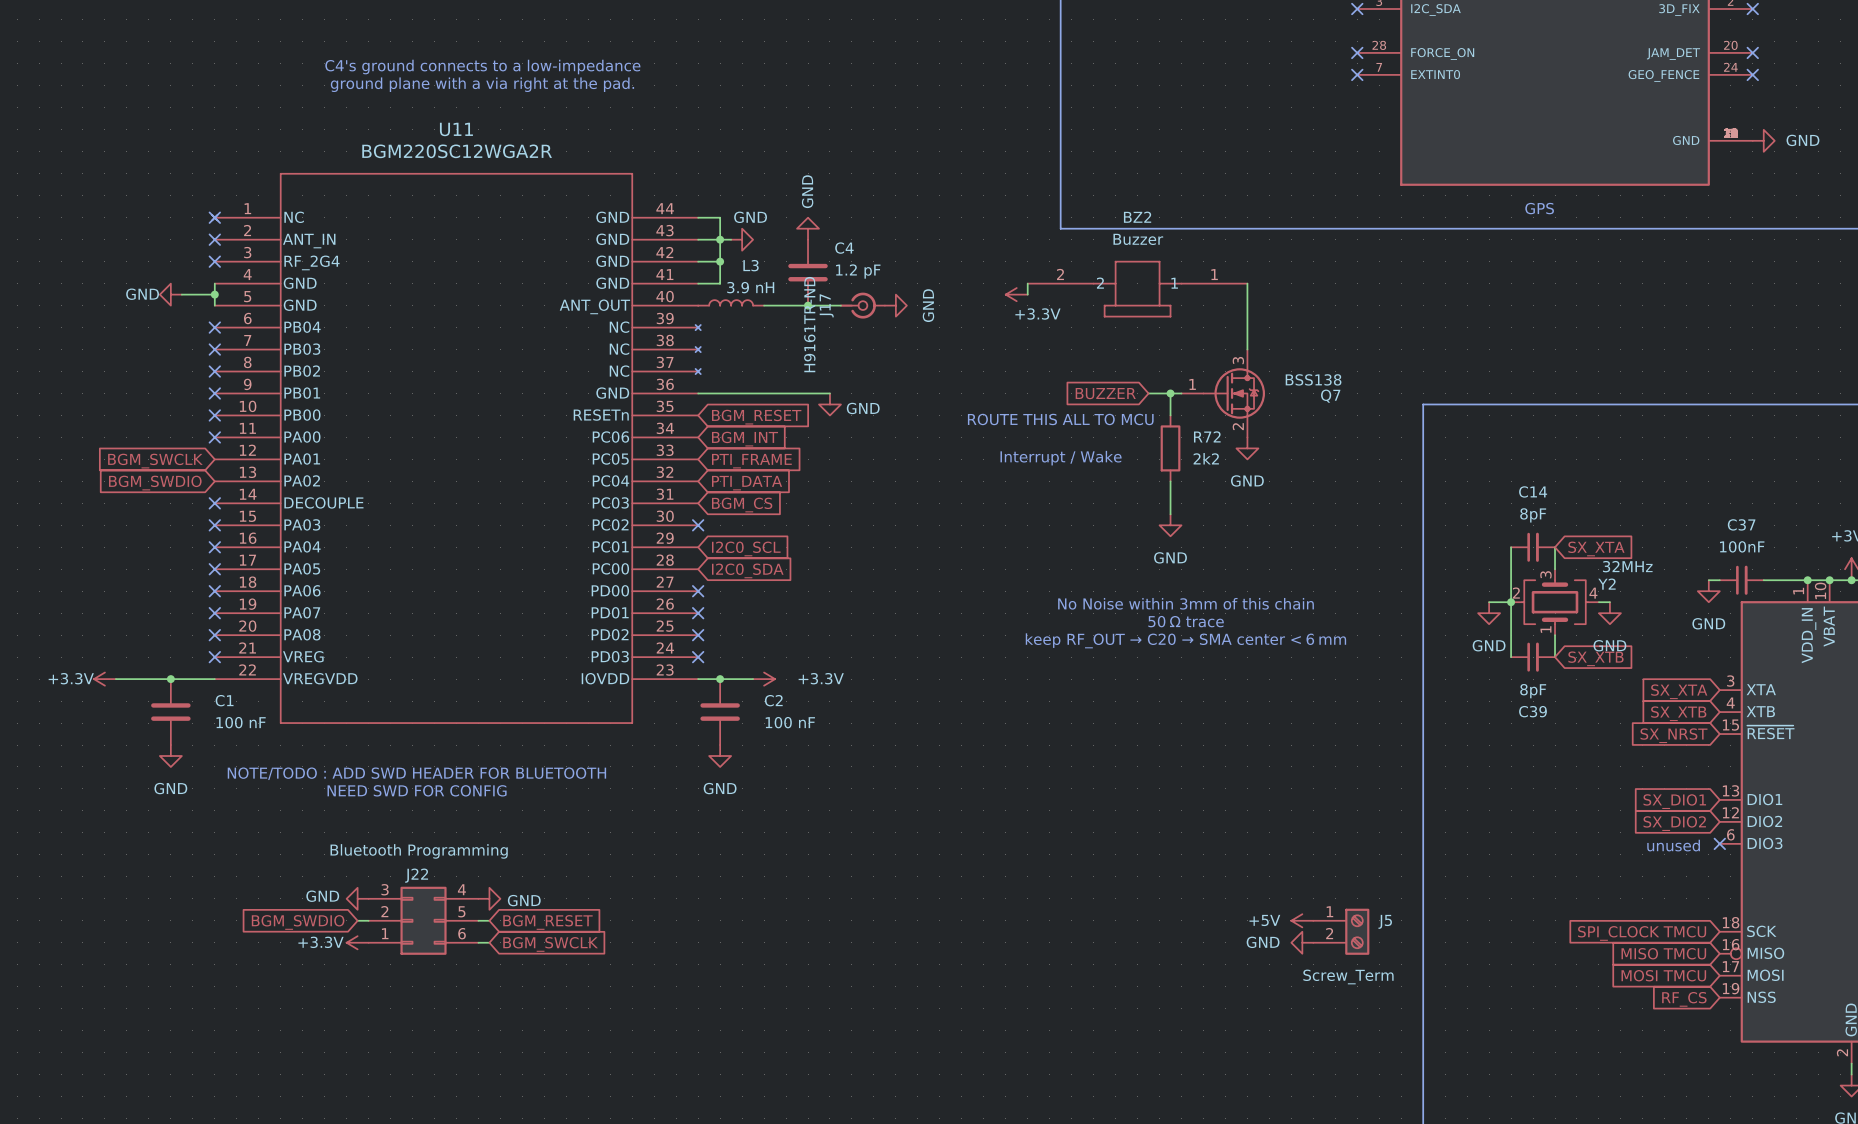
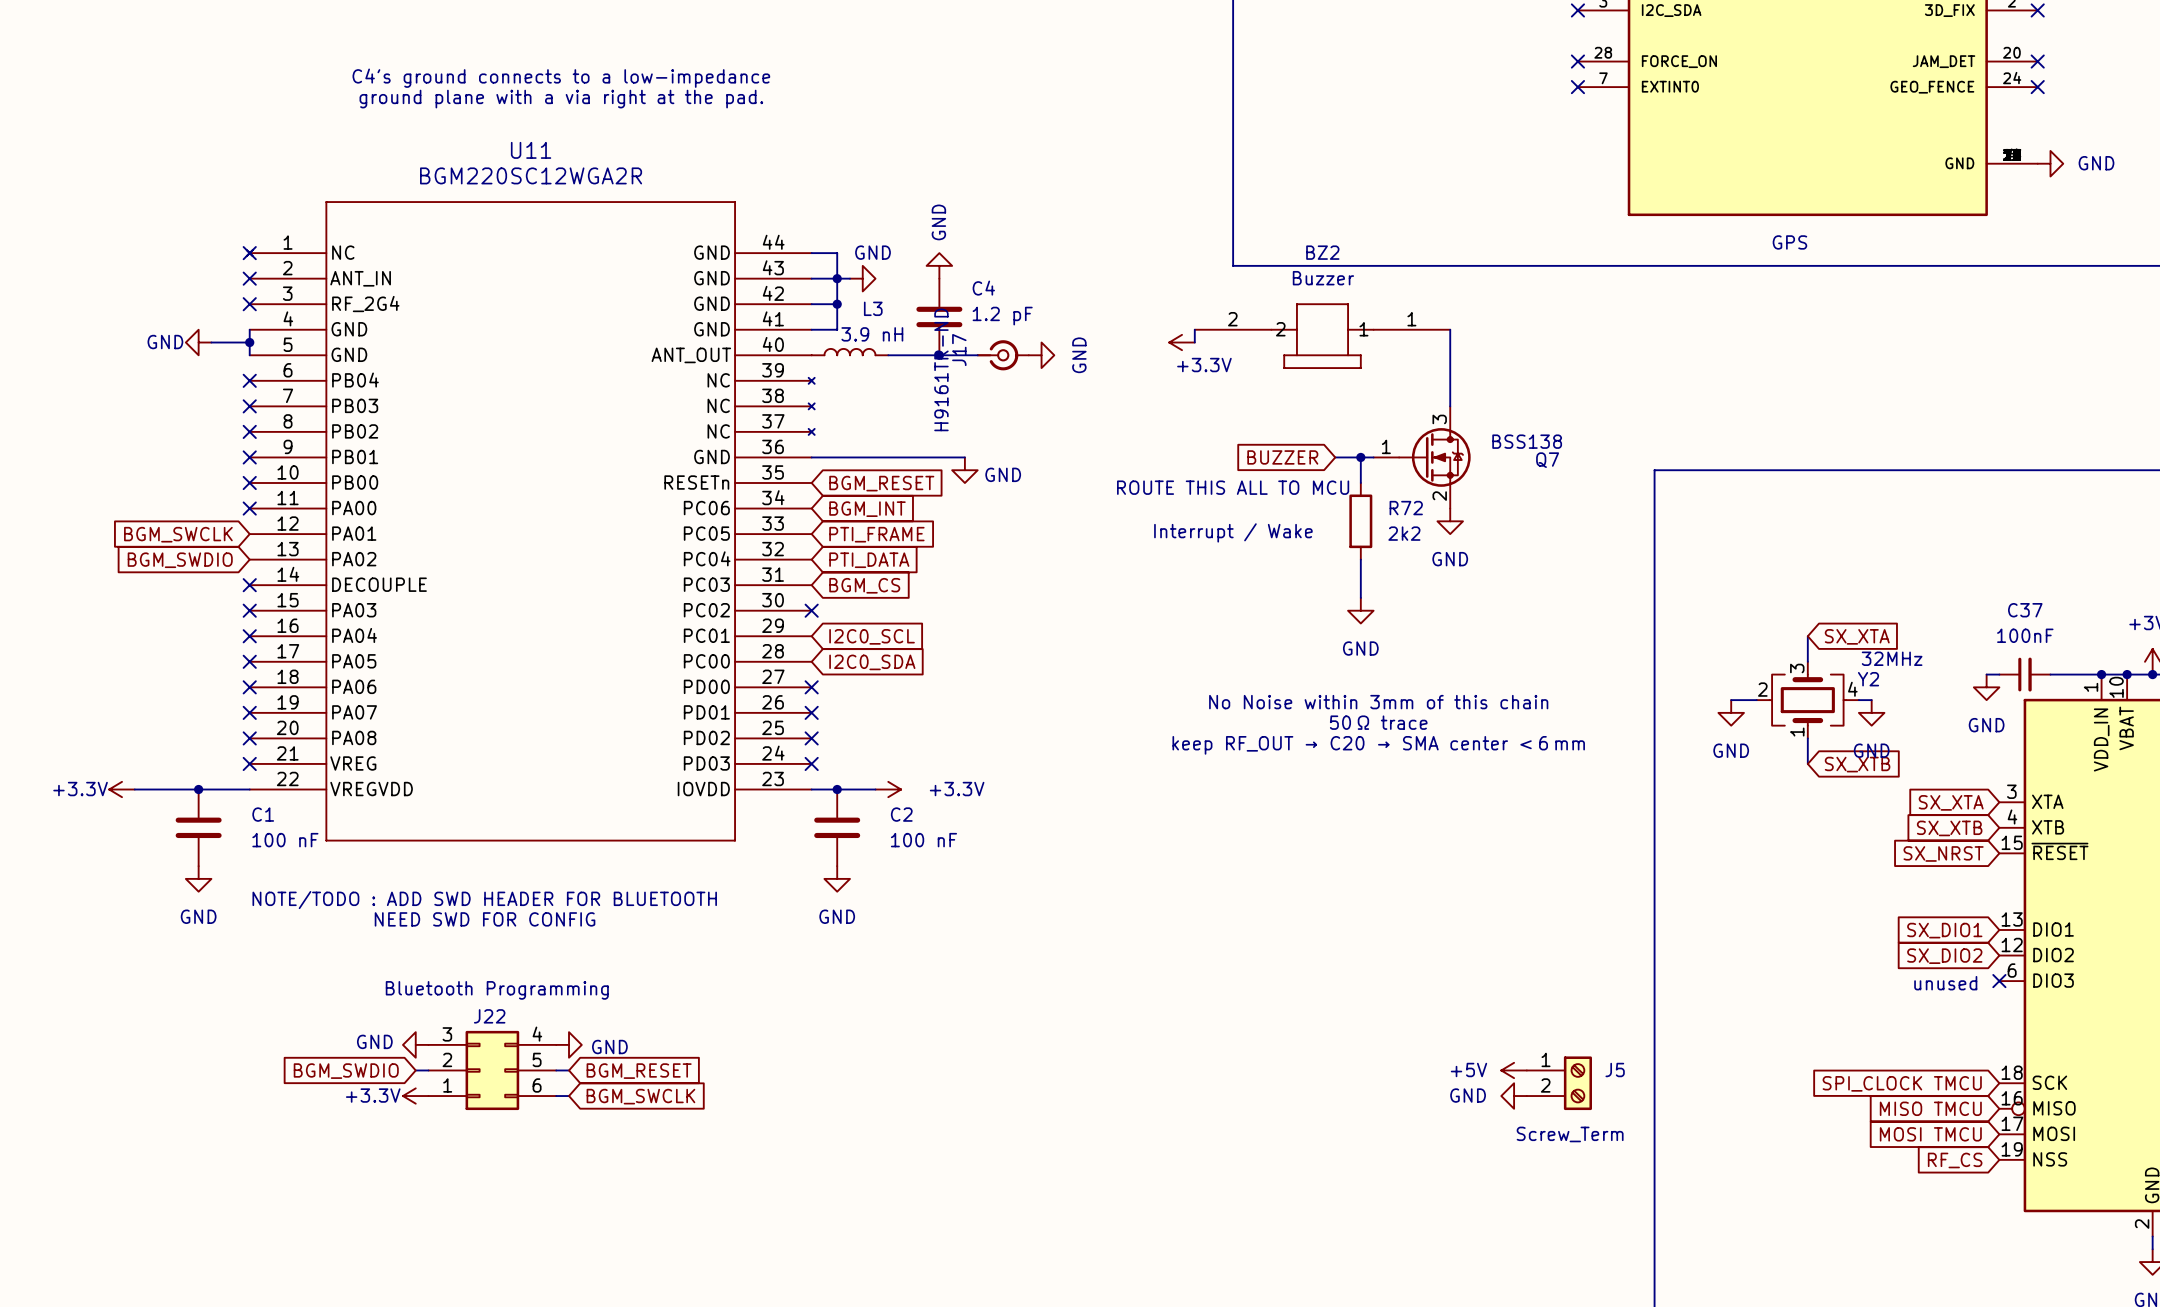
wire: (1511, 547) (1511, 657) -> none
C14: 8pF (1533, 547) -> none
junction: (1511, 602) -> none
C39: 8pF (1533, 657) -> none

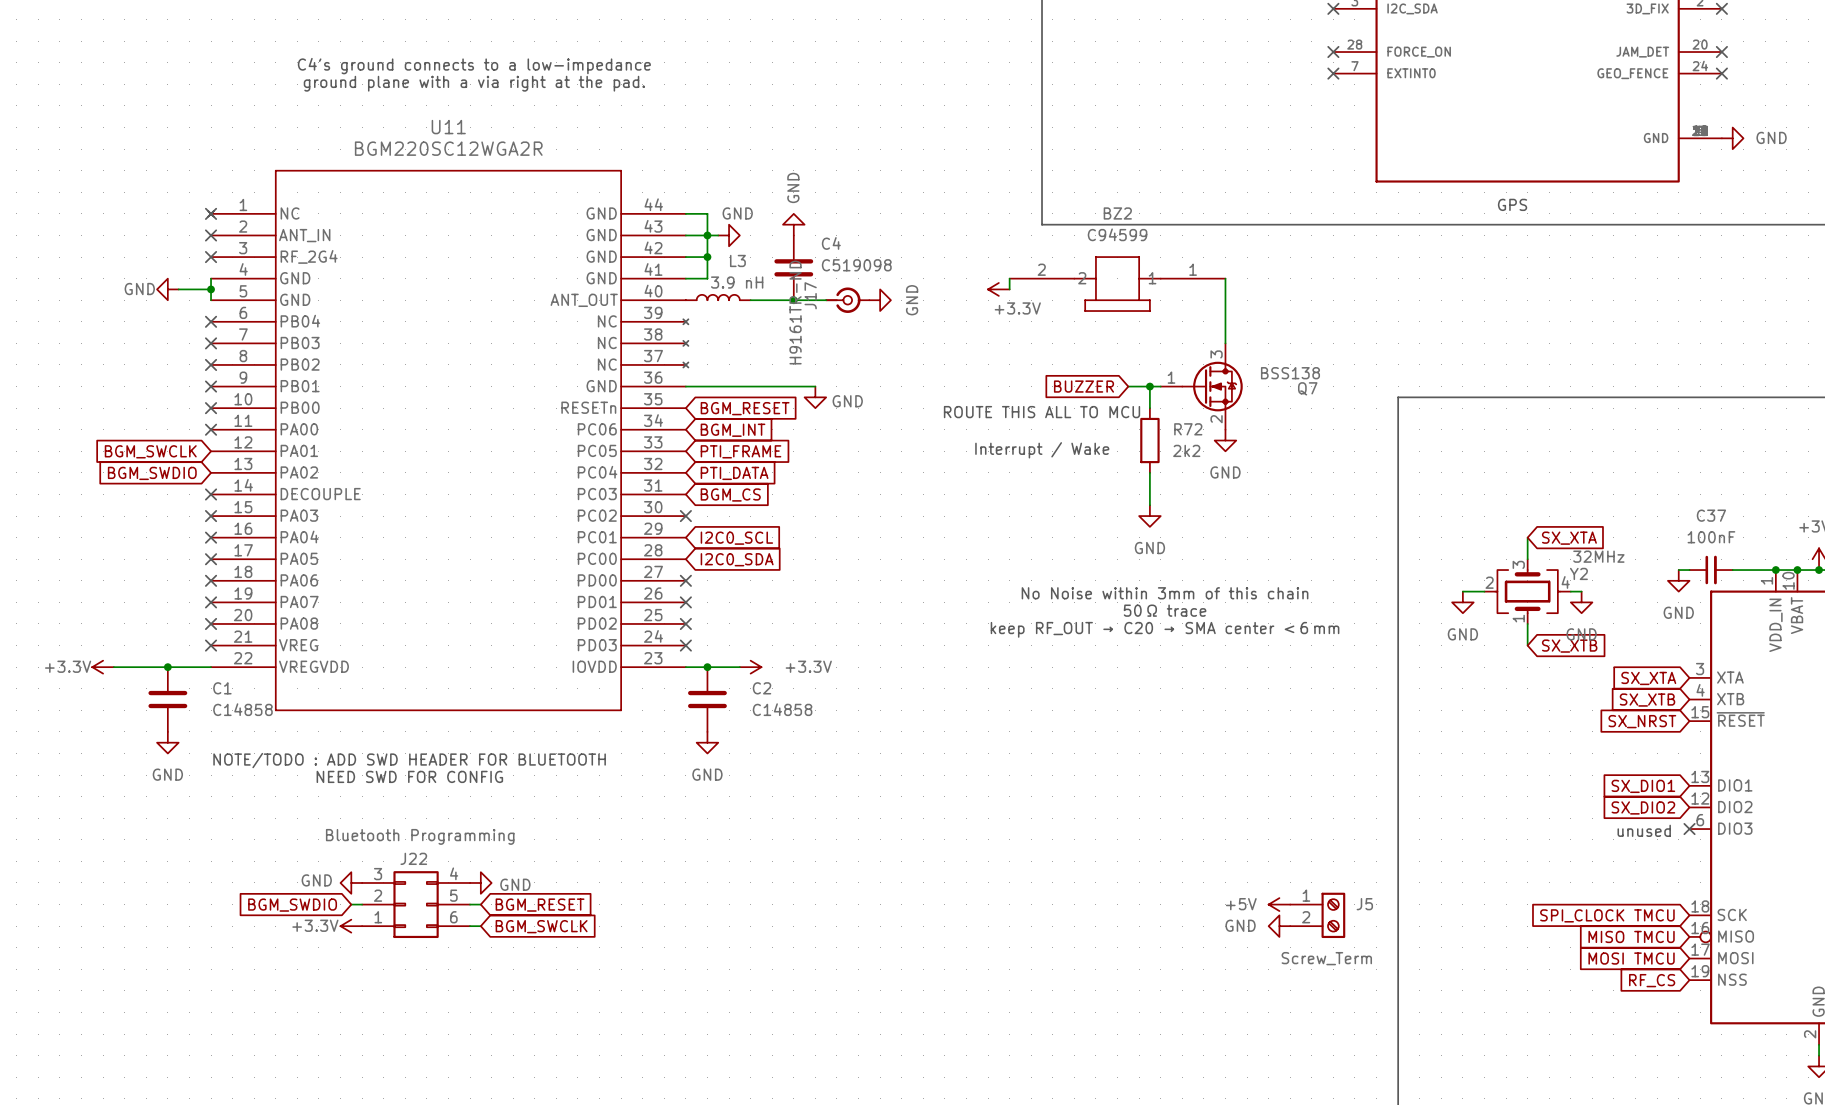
BZ2 value: Buzzer (1323, 278) -> C94599 (1117, 234)
C4 value: 1.2 pF (1002, 316) -> C519098 (856, 265)
C1 value: 100 nF (285, 840) -> C14858 (242, 709)
C2 value: 100 nF (923, 840) -> C14858 (782, 709)

